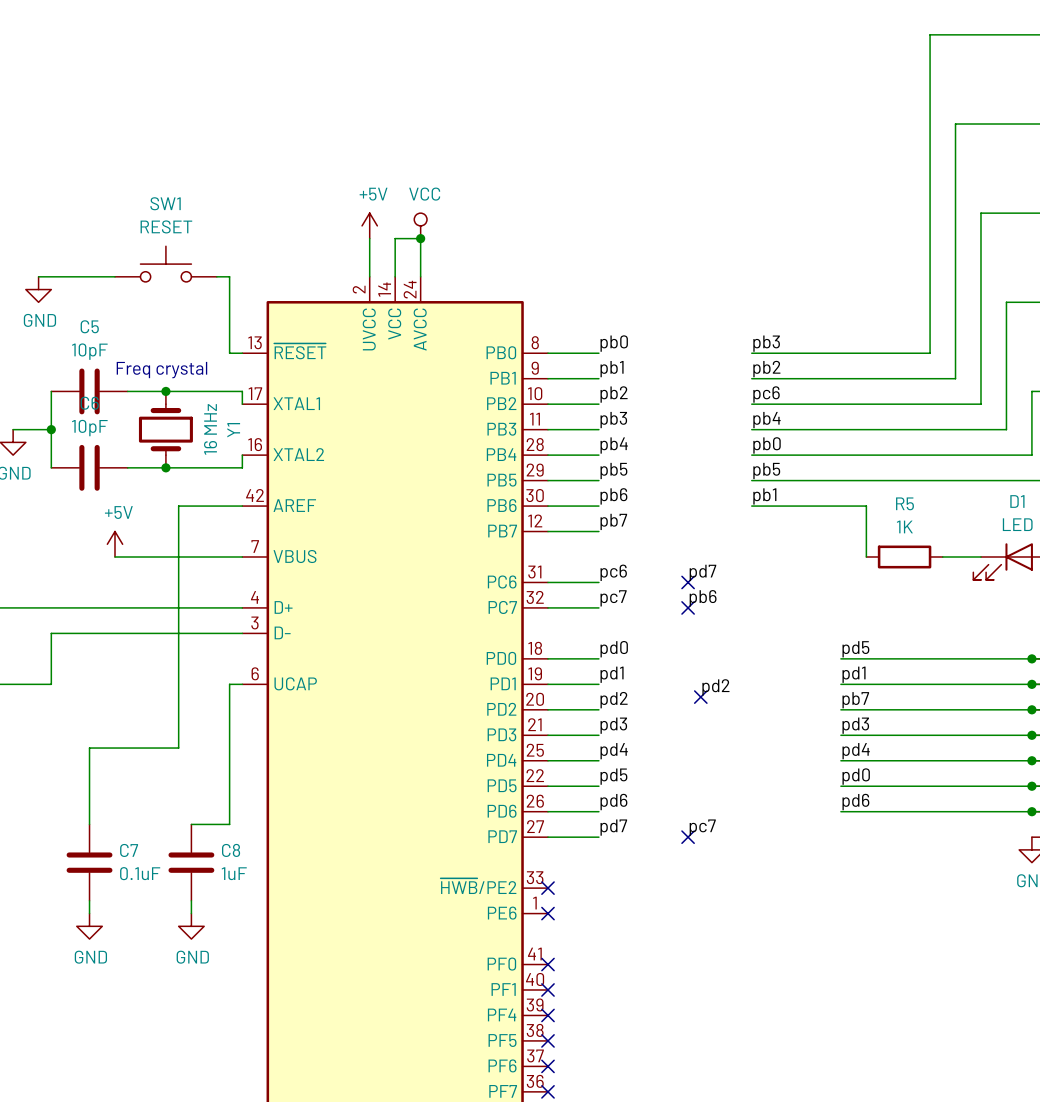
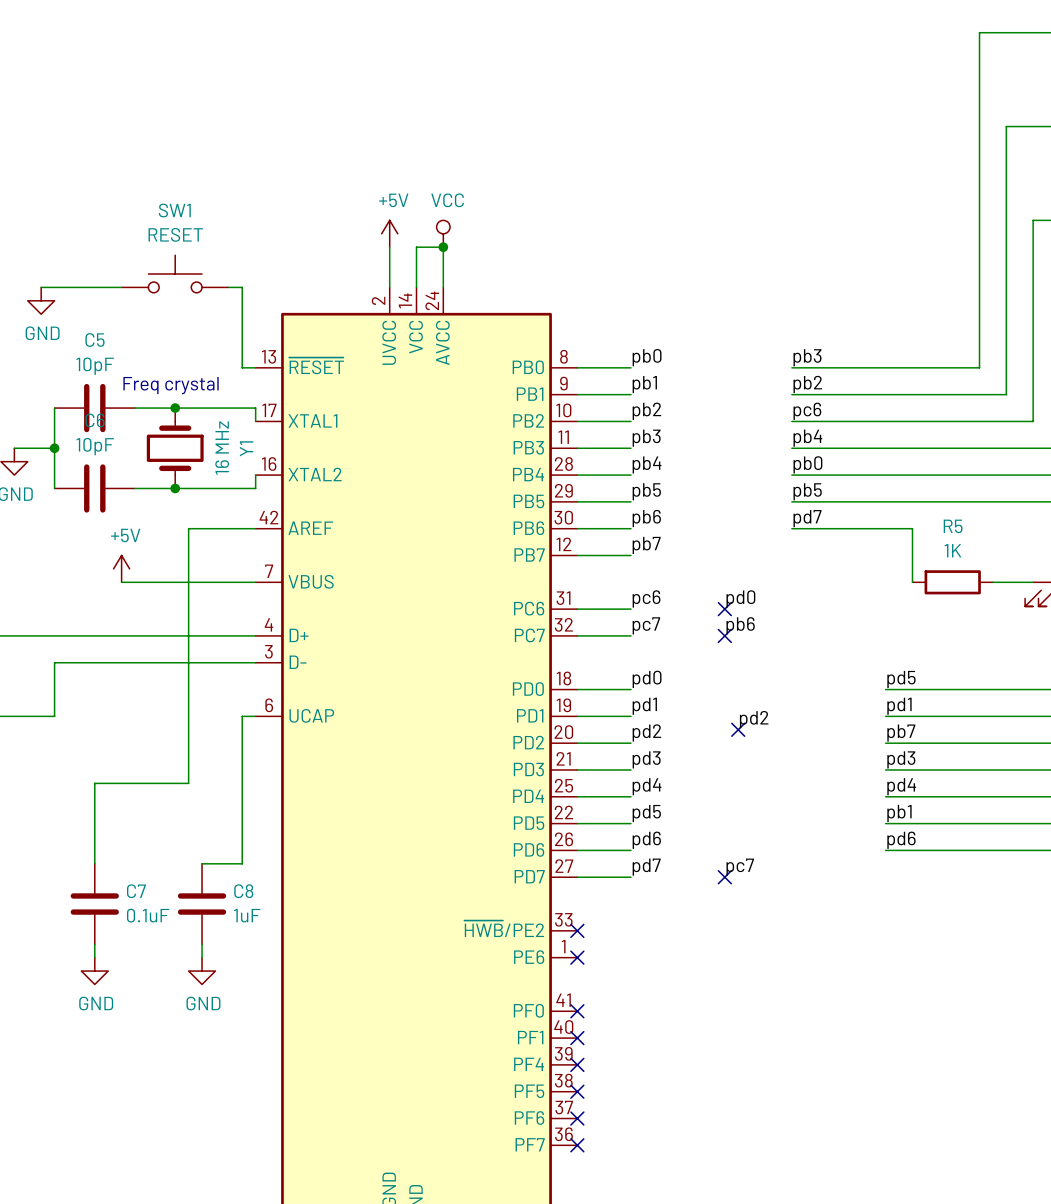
label: pb1 (764, 496) -> pd7 (807, 518)
label: pd7 (702, 572) -> pd0 (740, 598)
label: pd0 (856, 776) -> pb1 (899, 813)

